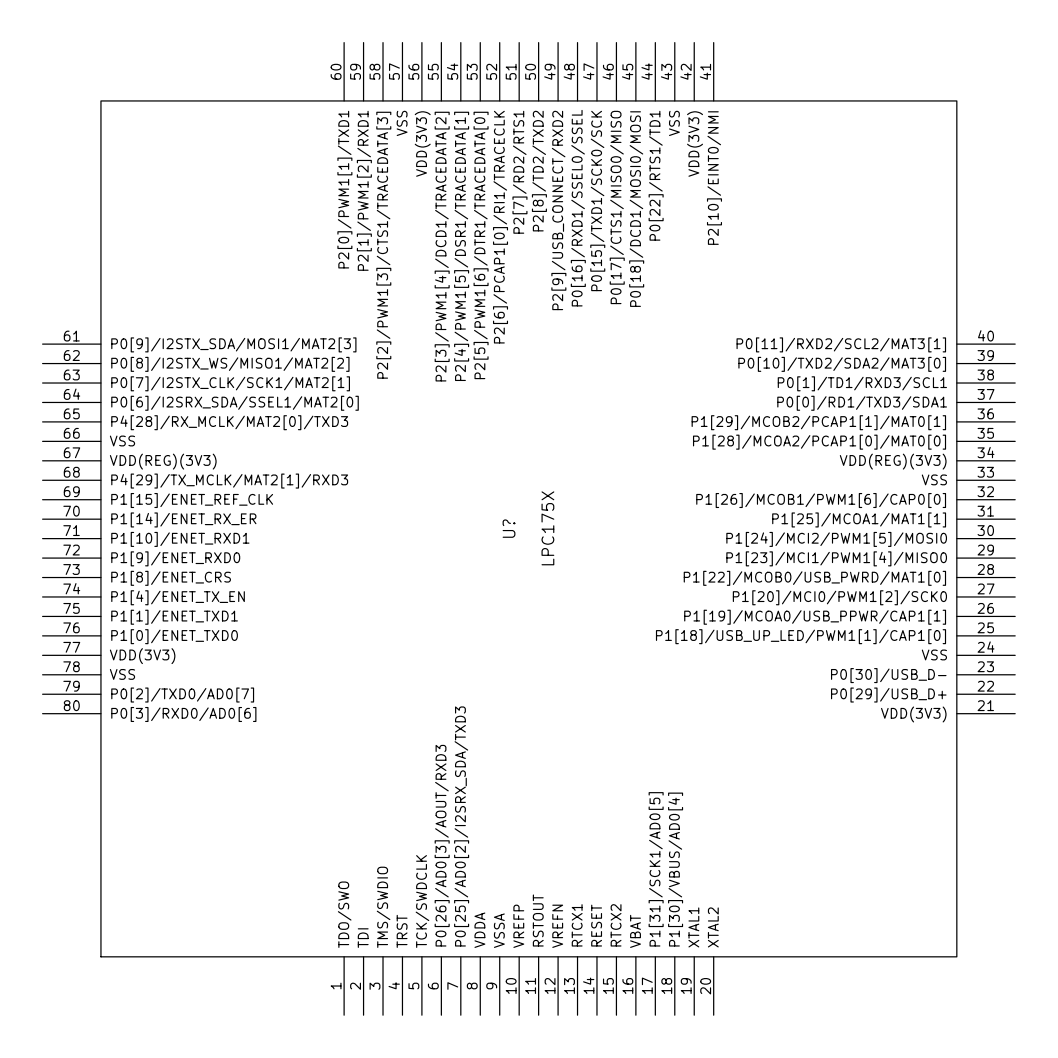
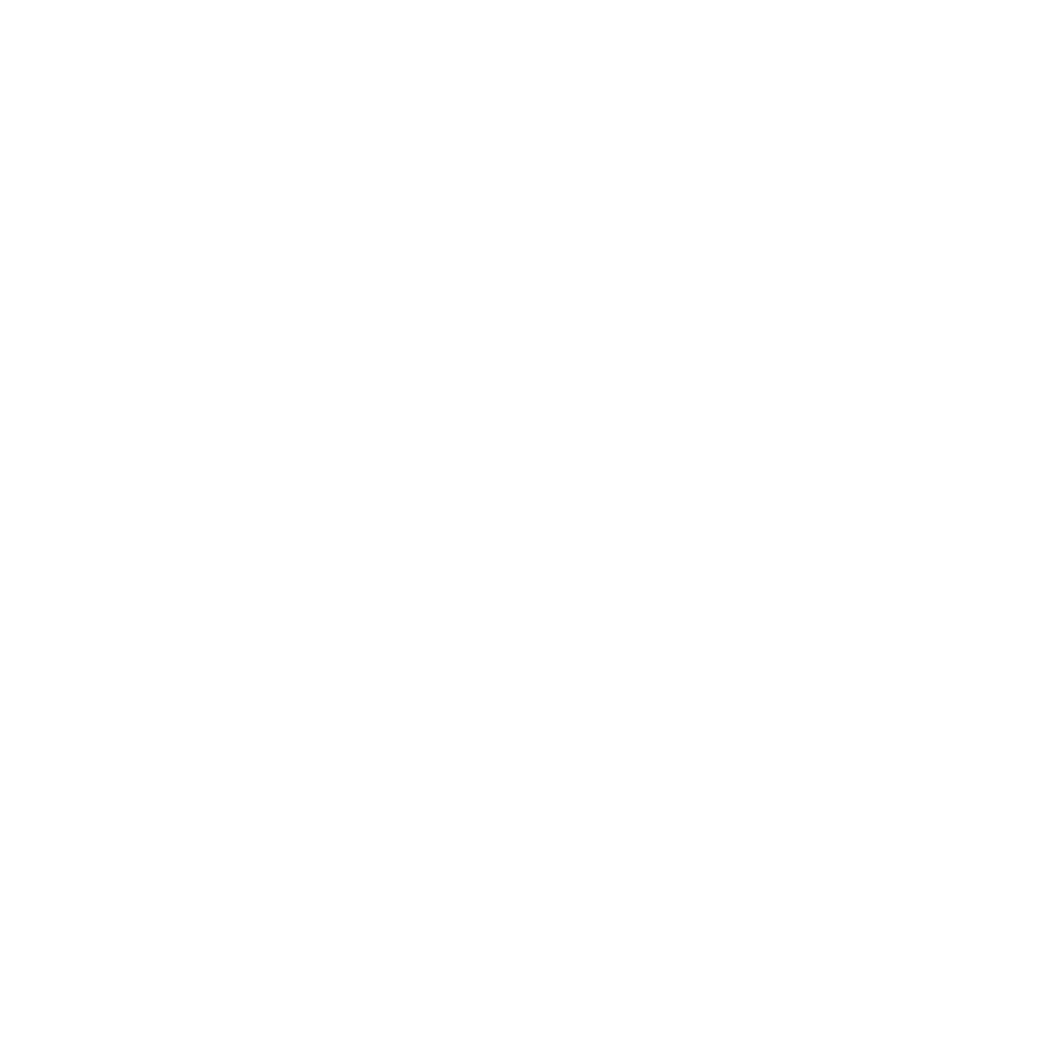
U?: LPC175X (528, 528) -> none

